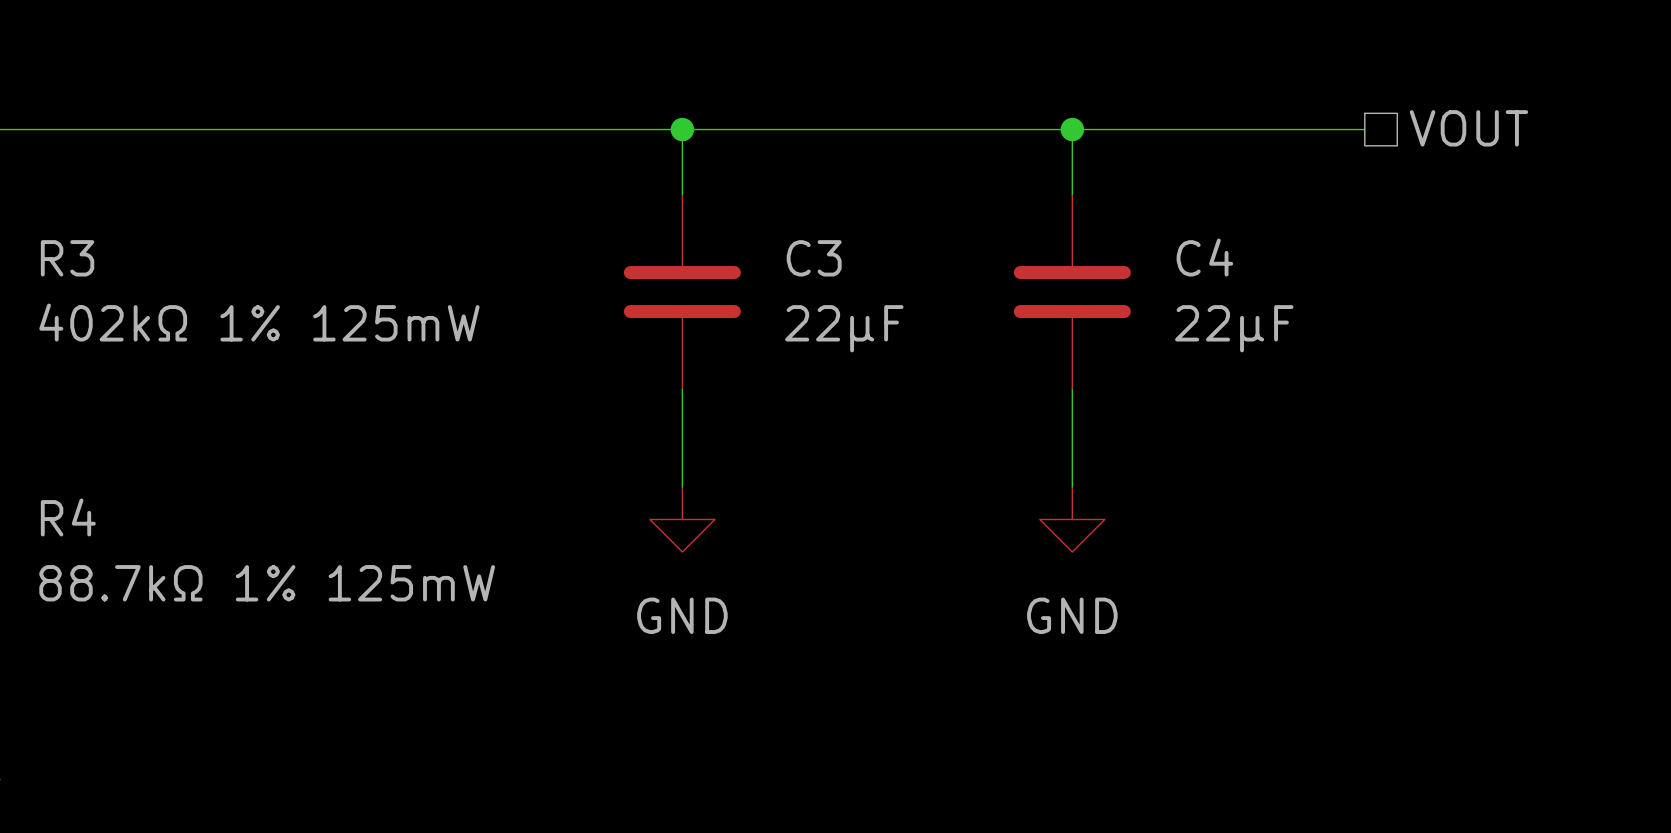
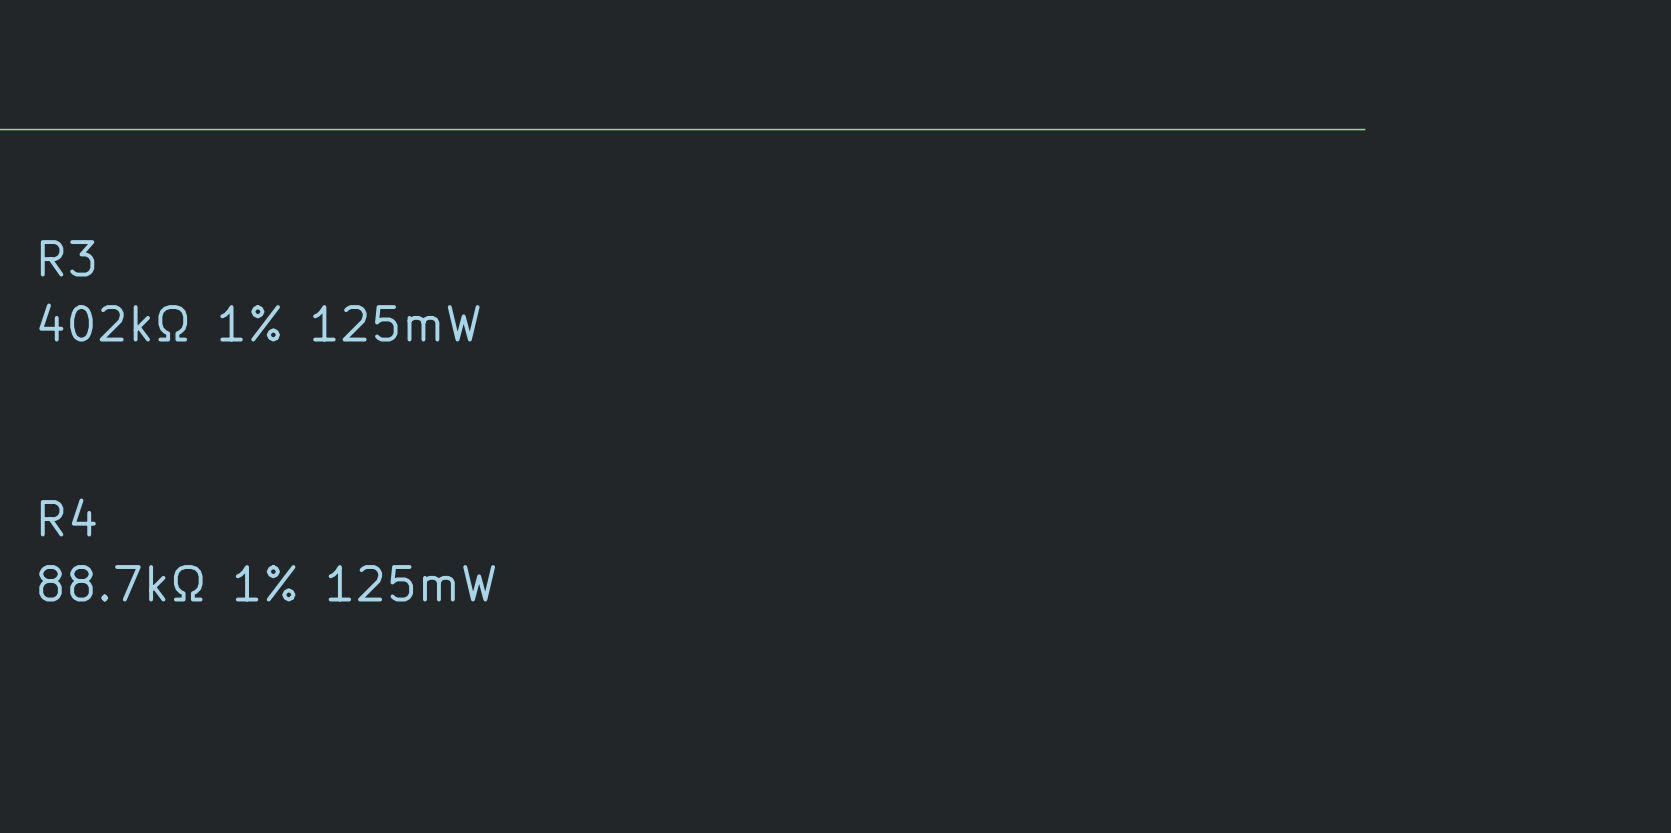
hierarchical label: VOUT (1468, 128) -> none
wire: (682, 129) (682, 194) -> none
junction: (682, 129) -> none
wire: (1072, 129) (1072, 194) -> none
junction: (1072, 129) -> none
C3: 22µF (682, 292) -> none
C4: 22µF (1072, 292) -> none
wire: (682, 389) (682, 487) -> none
wire: (1072, 389) (1072, 487) -> none
power symbol: GND (682, 519) -> none
power symbol: GND (1072, 519) -> none

